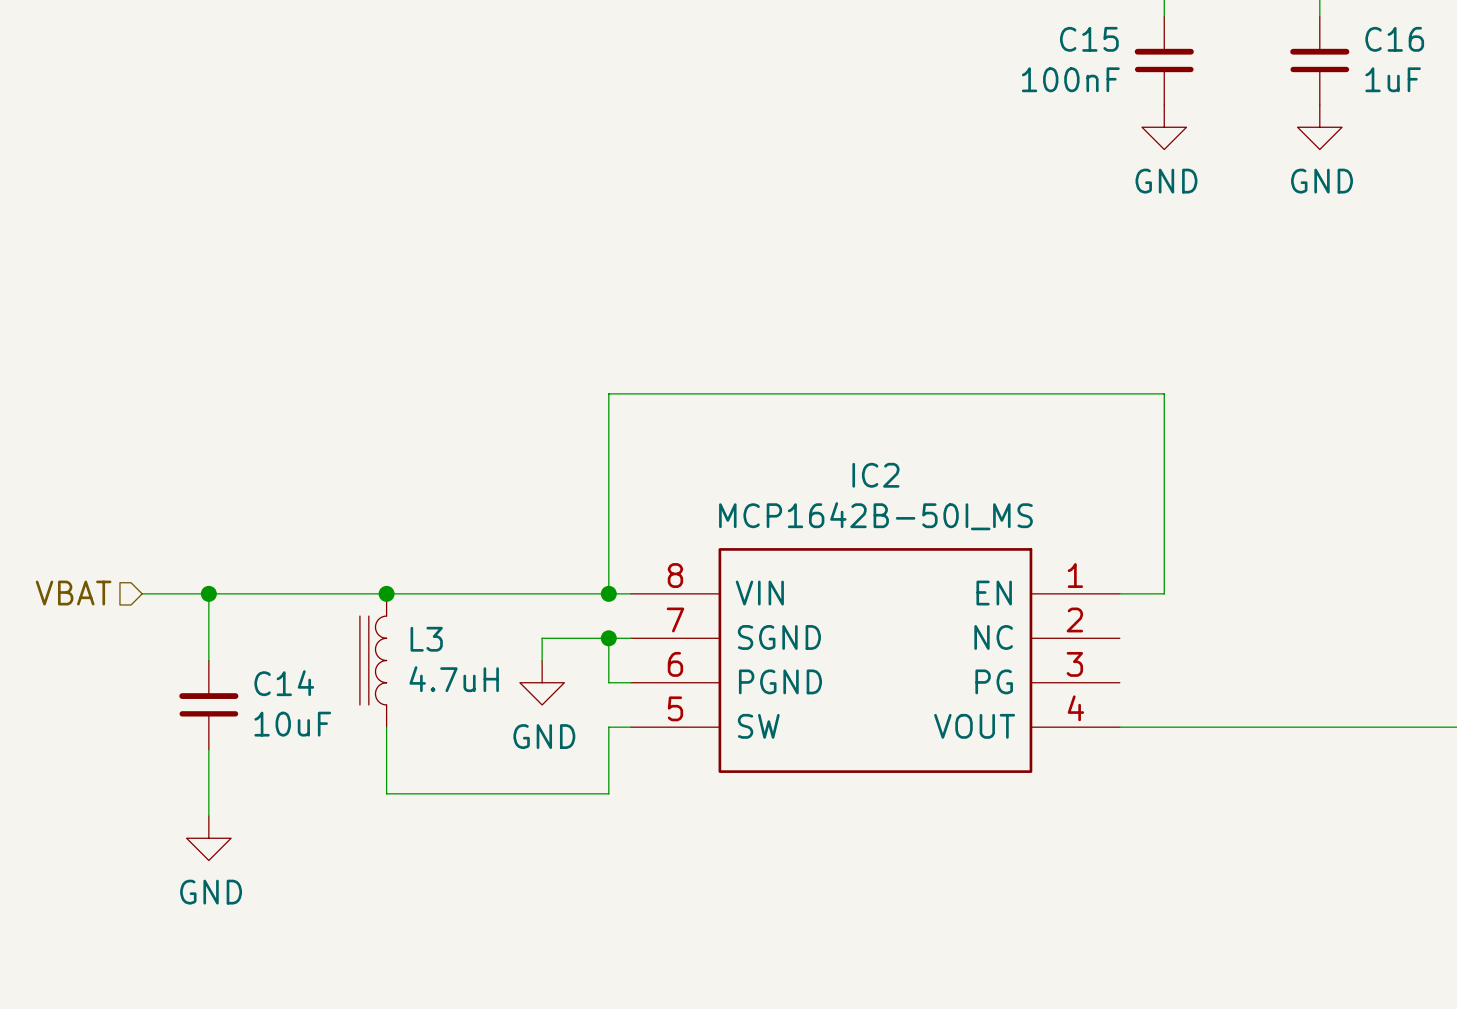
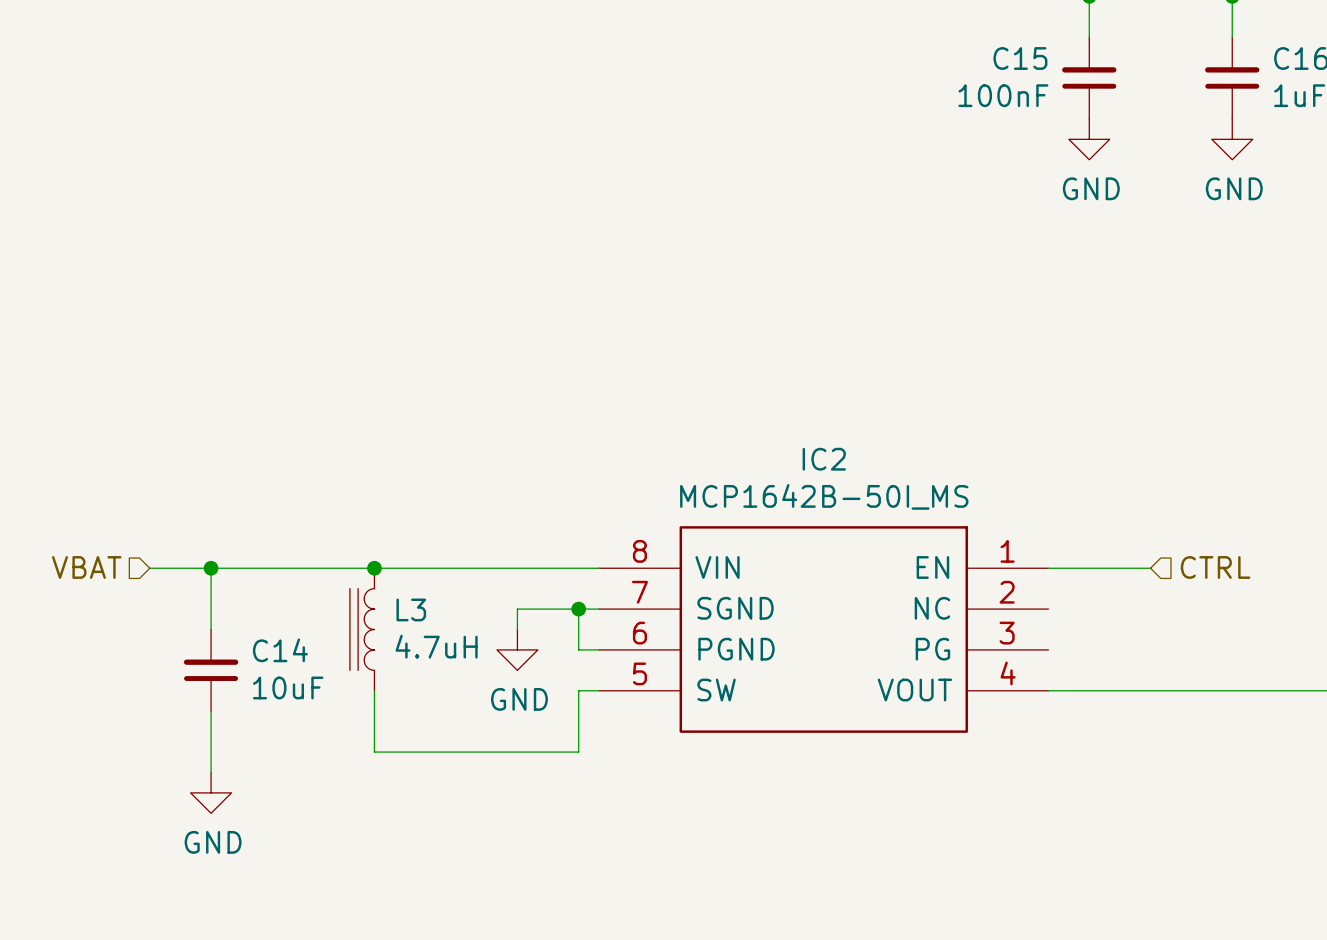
wire: (608, 593) (608, 393) (1164, 393) (1164, 593) -> (1150, 568) (1089, 568)
junction: (608, 593) -> none
hierarchical label: none -> CTRL (1215, 567)

